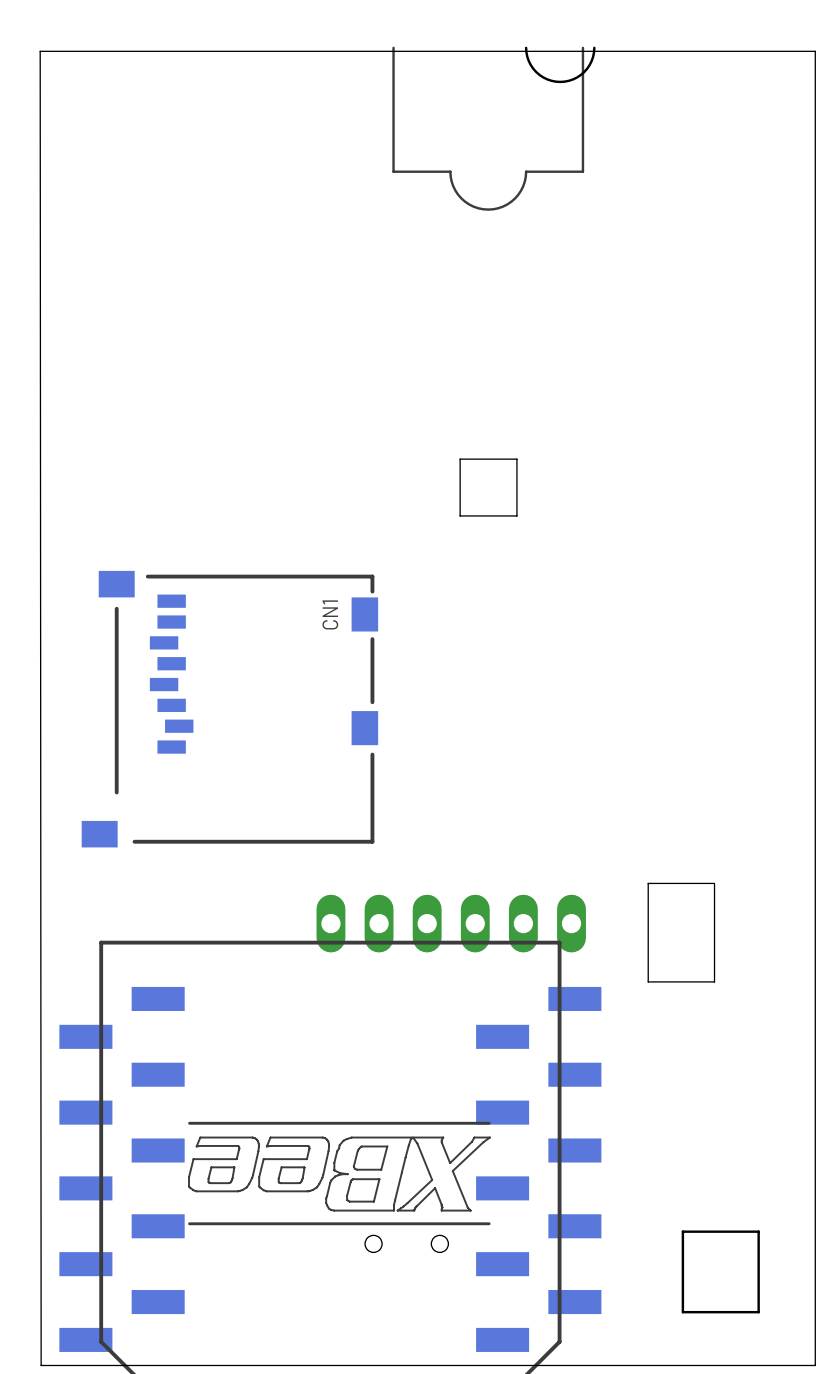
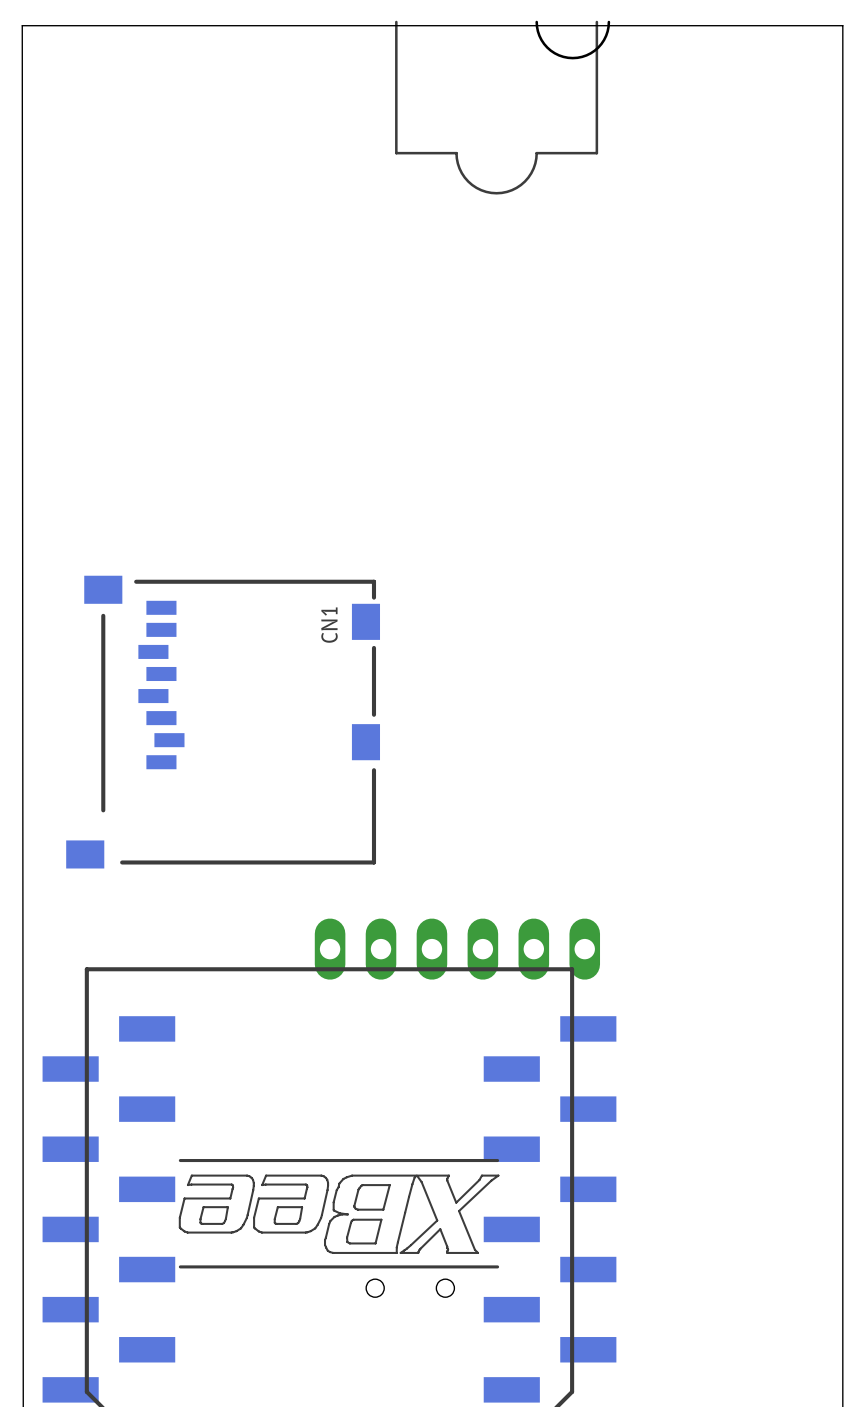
part: (488, 487) -> none
part: (681, 932) -> none
part: (720, 1271) -> none

